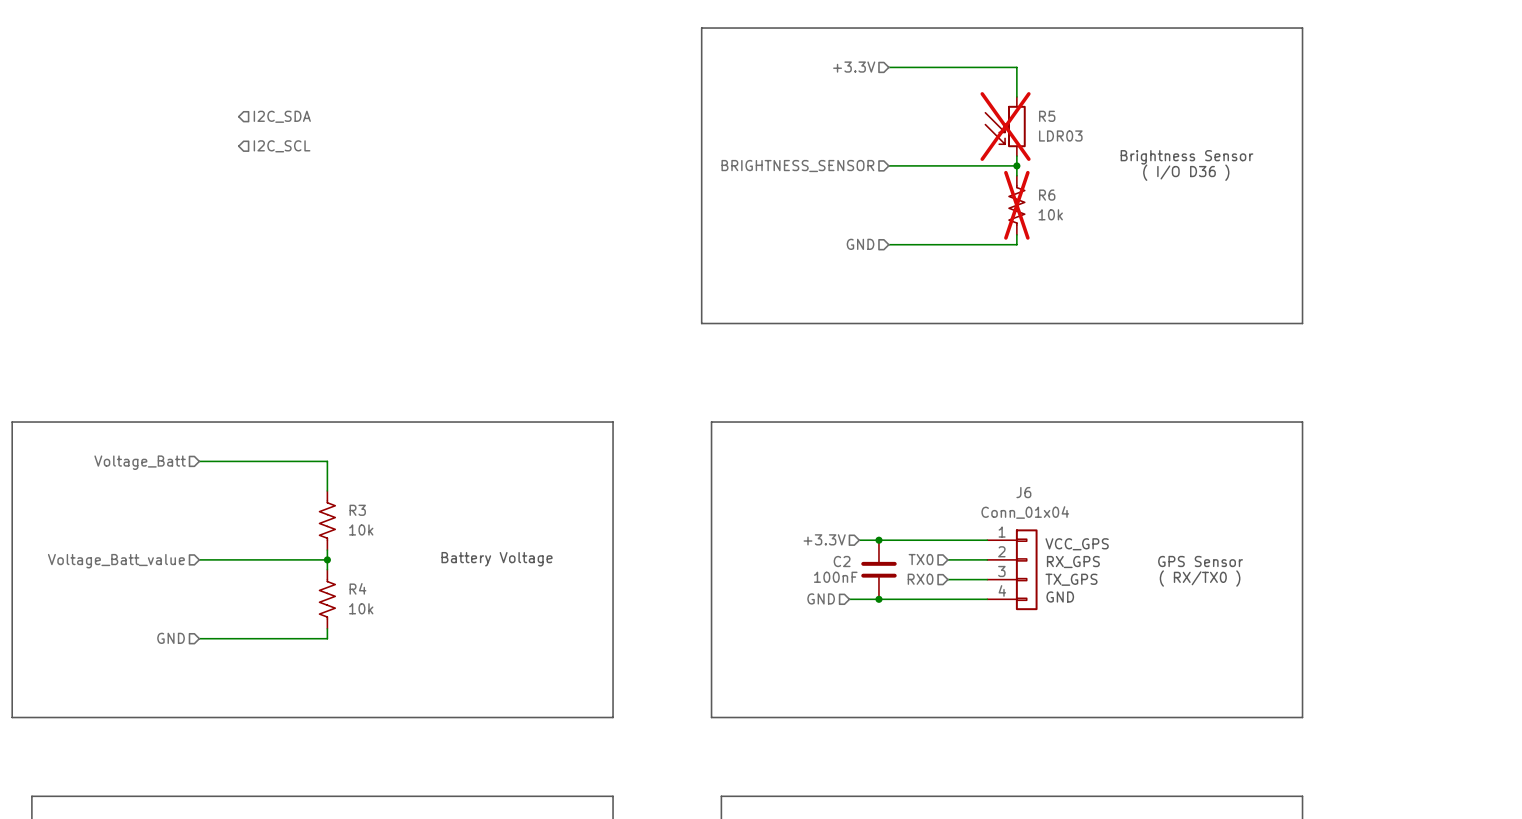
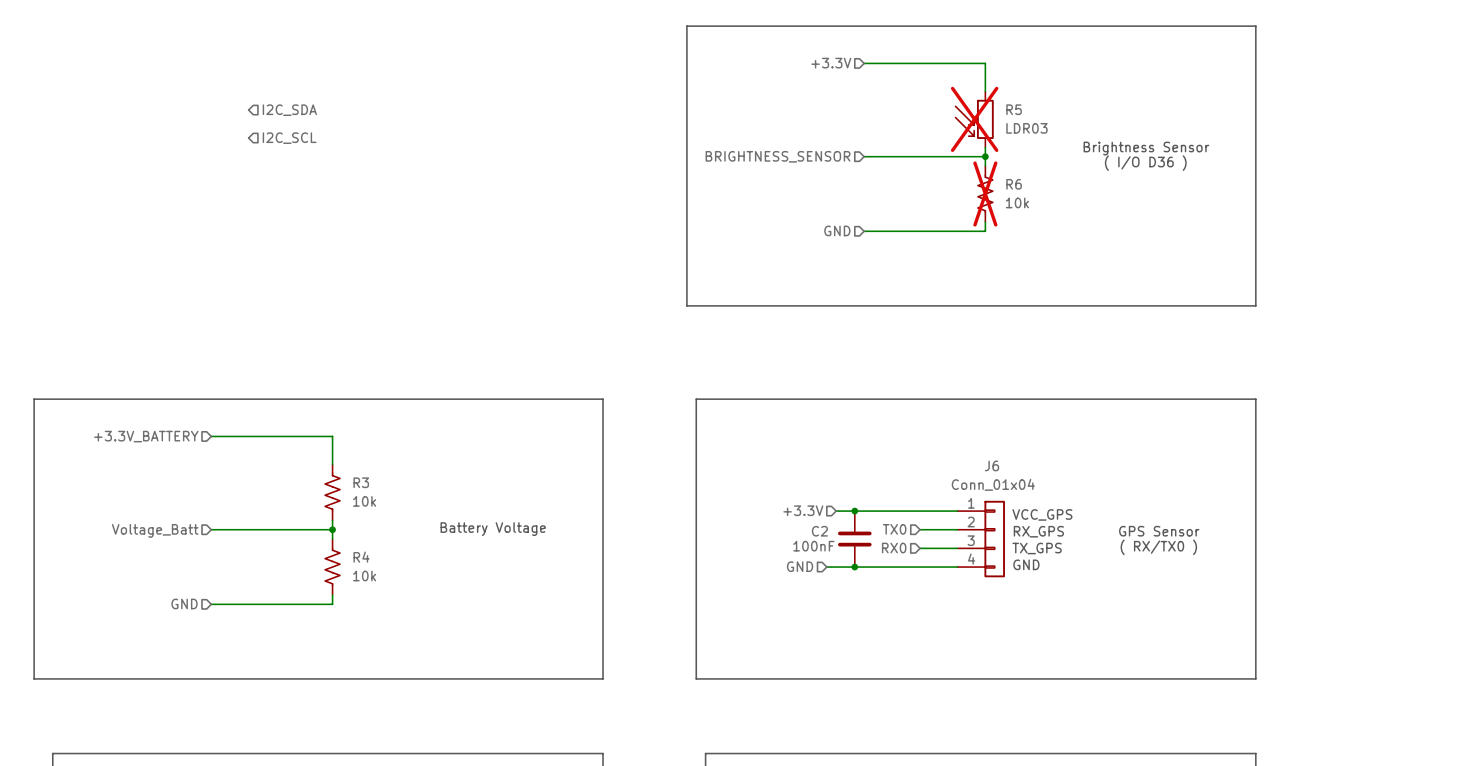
hierarchical label: Voltage_Batt (140, 462) -> +3.3V_BATTERY (146, 436)
hierarchical label: Voltage_Batt_value (116, 561) -> Voltage_Batt (155, 530)

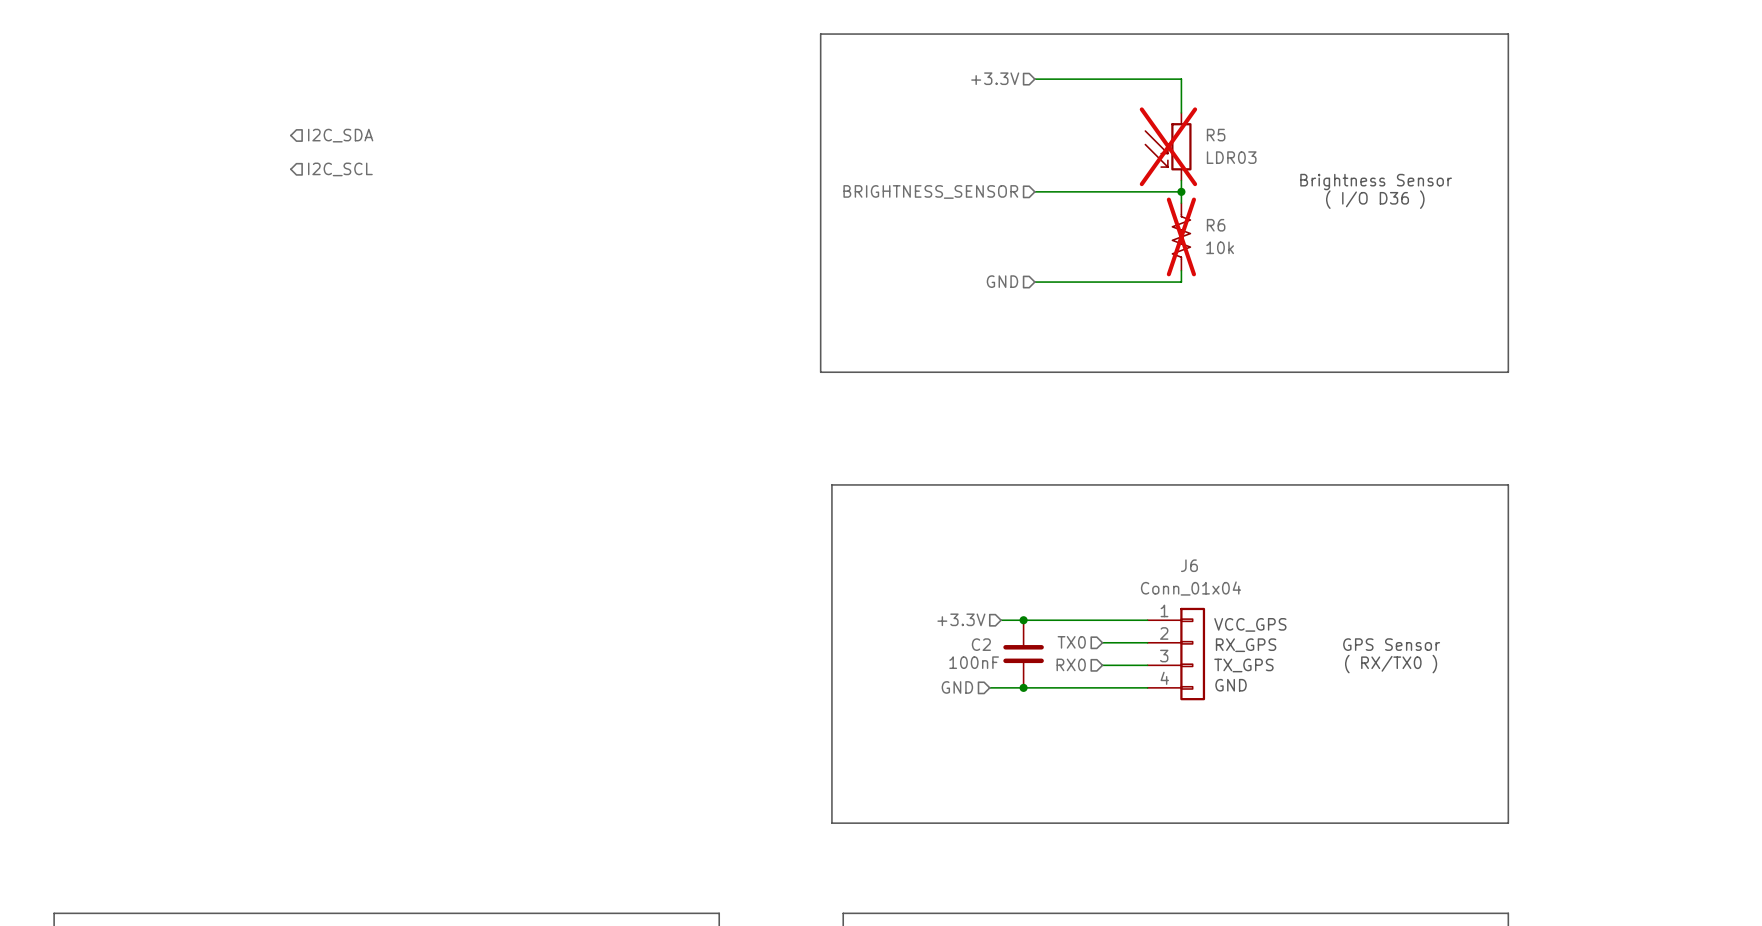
line: (34, 399) (603, 399) (603, 678) (34, 678) (34, 399) -> none
hierarchical label: +3.3V_BATTERY (146, 436) -> none
wire: (211, 436) (332, 436) (332, 464) -> none
R3: 10k (332, 492) -> none
wire: (332, 520) (332, 539) -> none
wire: (211, 529) (332, 529) -> none
junction: (332, 529) -> none
text: Battery Voltage (493, 529) -> none
hierarchical label: Voltage_Batt (155, 530) -> none
R4: 10k (332, 567) -> none
wire: (332, 595) (332, 604) (211, 604) -> none
hierarchical label: GND (184, 603) -> none

